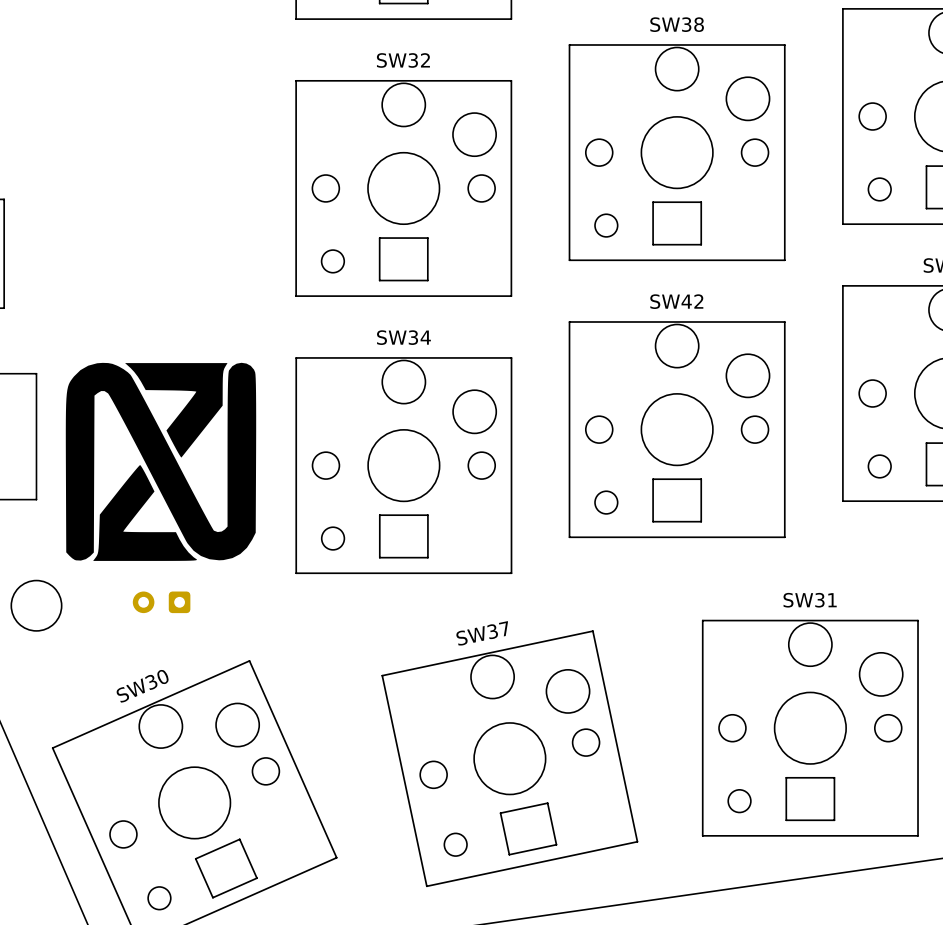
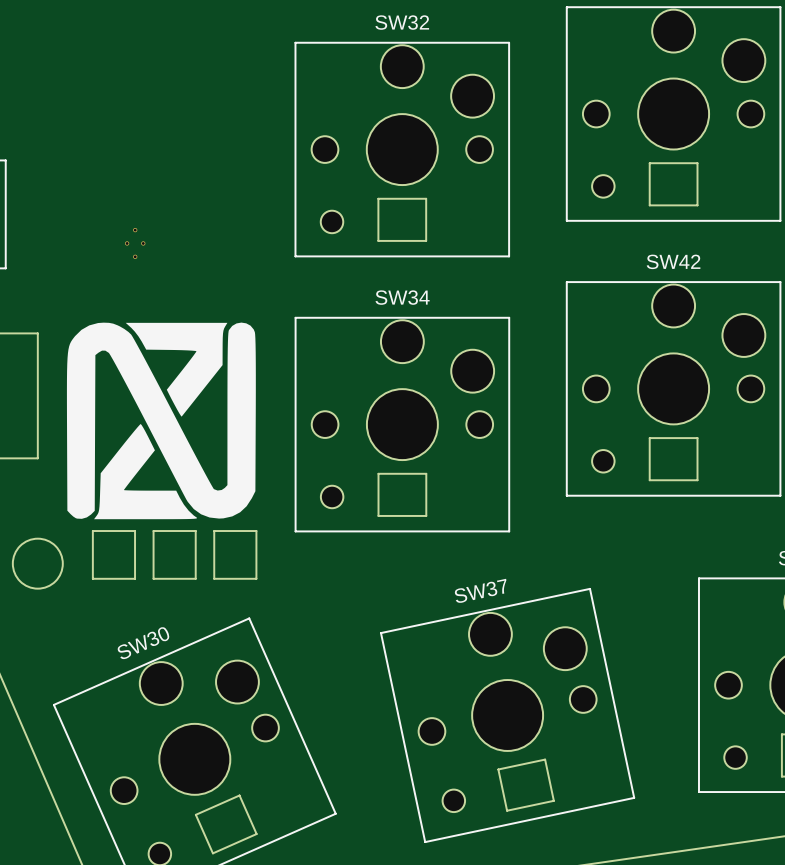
part: none -> (135, 243)
part footprint: [132, 591, 191, 614] -> [152, 530, 197, 580]
part: none -> (113, 554)
part: none -> (235, 554)

